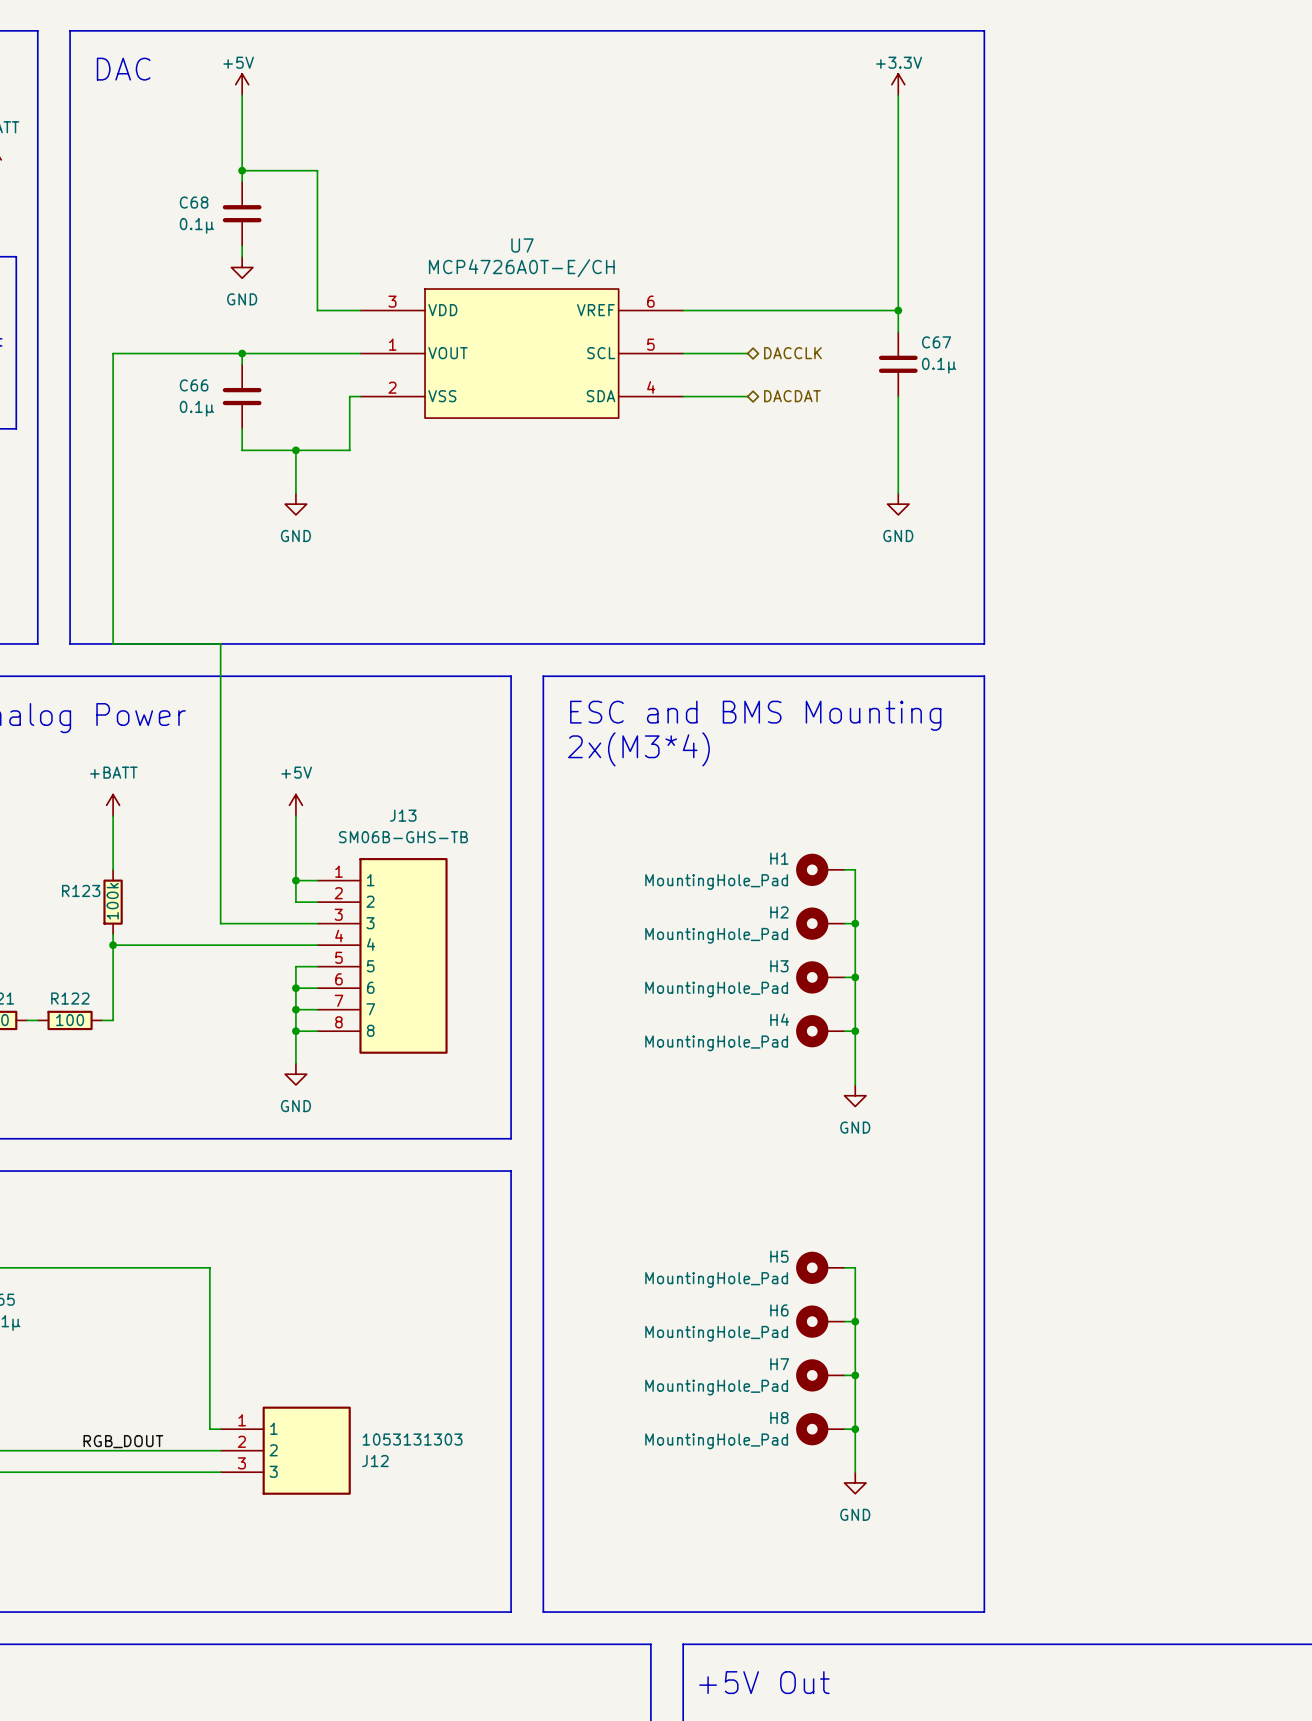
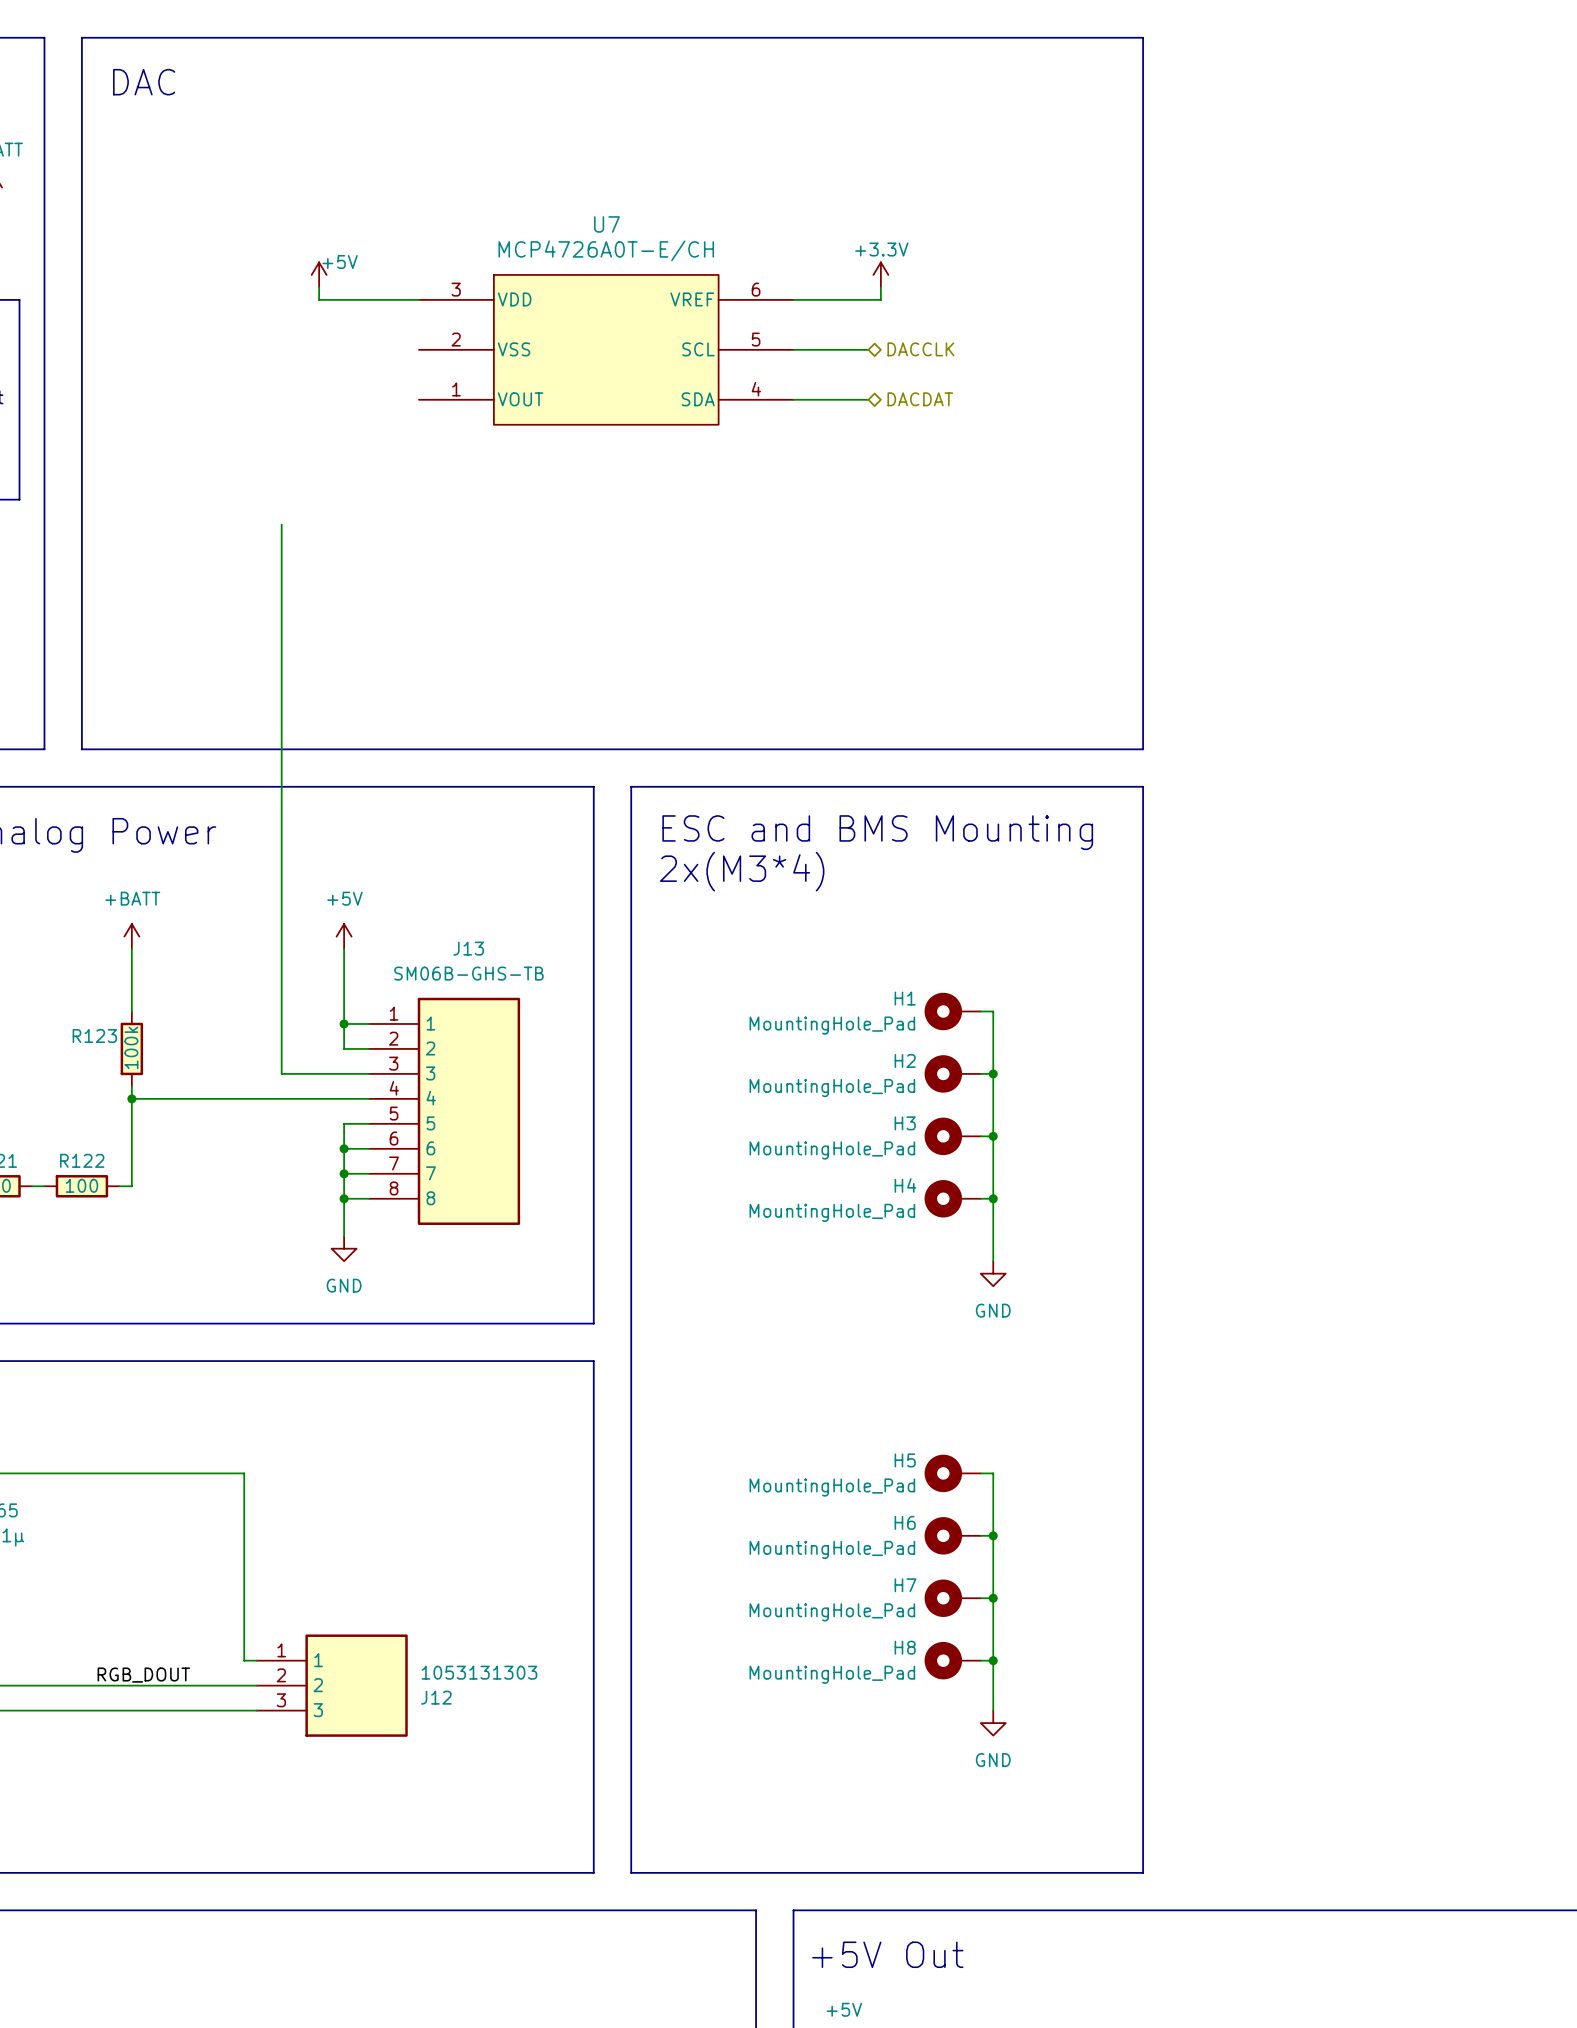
power symbol text position: +5V (238, 62) -> +5V (340, 262)
power symbol position: +5V (242, 84) -> +5V (319, 274)
power symbol position: +3.3V (898, 84) -> +3.3V (880, 274)
wire: (242, 95) (242, 181) -> none
wire: (898, 95) (898, 332) -> none
wire: (242, 170) (317, 170) (317, 310) (360, 310) -> none
junction: (242, 170) -> none
C68: 0.1µ (242, 213) -> none
wire: (242, 245) (242, 256) -> none
wire: none -> (319, 287) (319, 299) (418, 299)
wire: none -> (880, 287) (880, 299) (793, 299)
power symbol: GND (242, 267) -> none
wire: (683, 310) (898, 310) -> none
junction: (898, 310) -> none
U7 pin number: 1 (392, 344) -> 2 (456, 339)
wire: (242, 353) (242, 364) -> none
junction: (242, 353) -> none
wire: (360, 353) (113, 353) (113, 643) (220, 643) (220, 923) (242, 923) -> (281, 524) (281, 1073)
U7 pin name: VOUT (447, 353) -> VSS (514, 349)
U7 position: (521, 353) -> (606, 349)
wire: (683, 353) (747, 353) -> (793, 349) (868, 349)
hierarchical label position: DACCLK (792, 353) -> DACCLK (920, 349)
C67: 0.1µ (898, 364) -> none
U7 pin number: 2 (392, 387) -> 1 (456, 389)
C66: 0.1µ (242, 396) -> none
wire: (360, 396) (349, 396) (349, 450) (242, 450) (242, 428) -> none
U7 pin name: VSS (442, 396) -> VOUT (520, 399)
wire: (683, 396) (747, 396) -> (793, 399) (868, 399)
hierarchical label position: DACDAT (792, 396) -> DACDAT (920, 399)
wire: (898, 396) (898, 493) -> none
wire: (295, 450) (295, 493) -> none
junction: (295, 450) -> none
power symbol: GND (295, 504) -> none
power symbol: GND (898, 504) -> none

